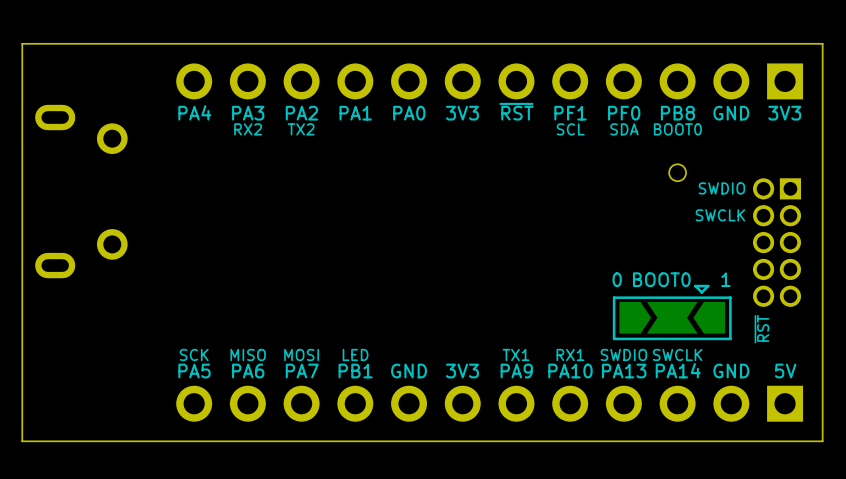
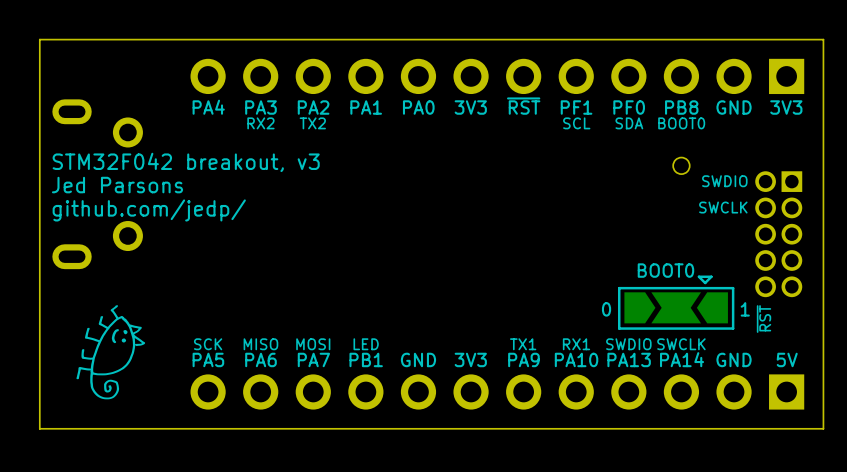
text: none -> STM32F042 breakout, v3 (186, 162)
text: none -> Jed Parsons (117, 185)
text: none -> github.com/jedp/ (149, 210)
text position: 0 (617, 279) -> 0 (606, 309)
text position: 1 (725, 279) -> 1 (745, 309)
drawing: none -> [76, 305, 146, 400]

